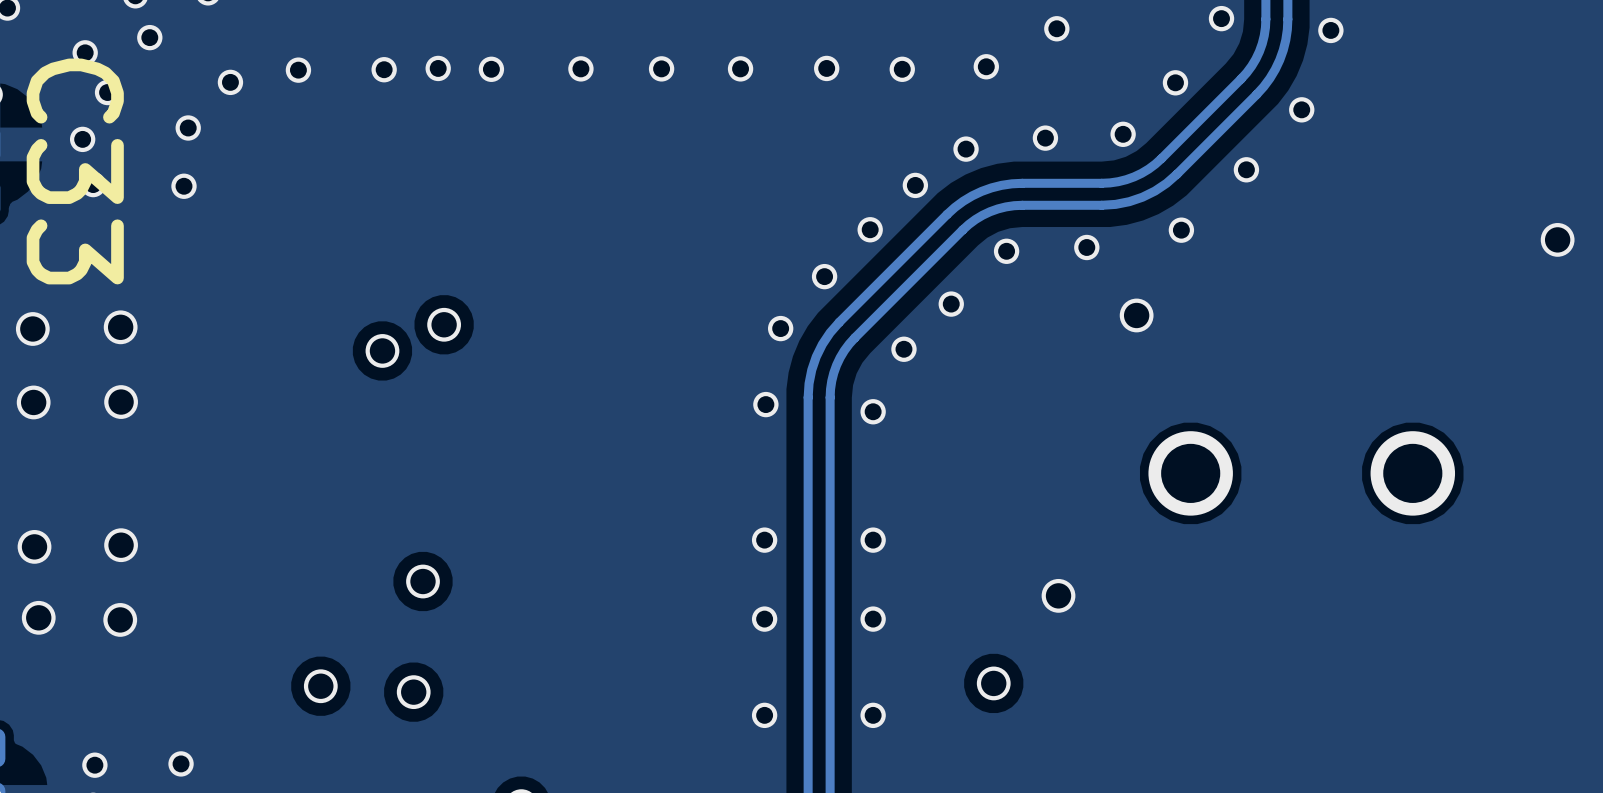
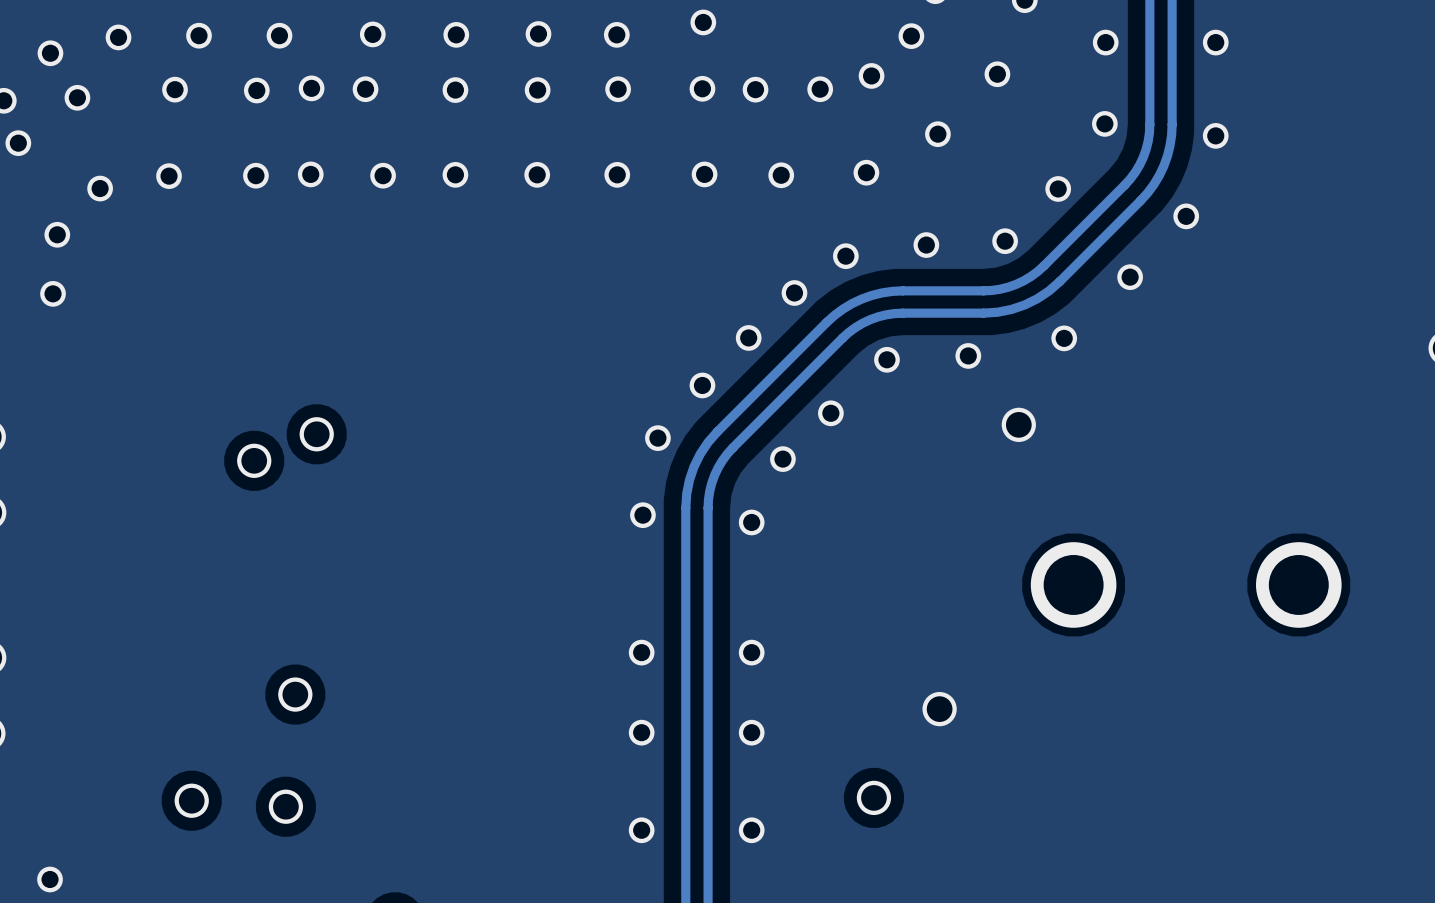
via position: (491, 69) -> (383, 175)

